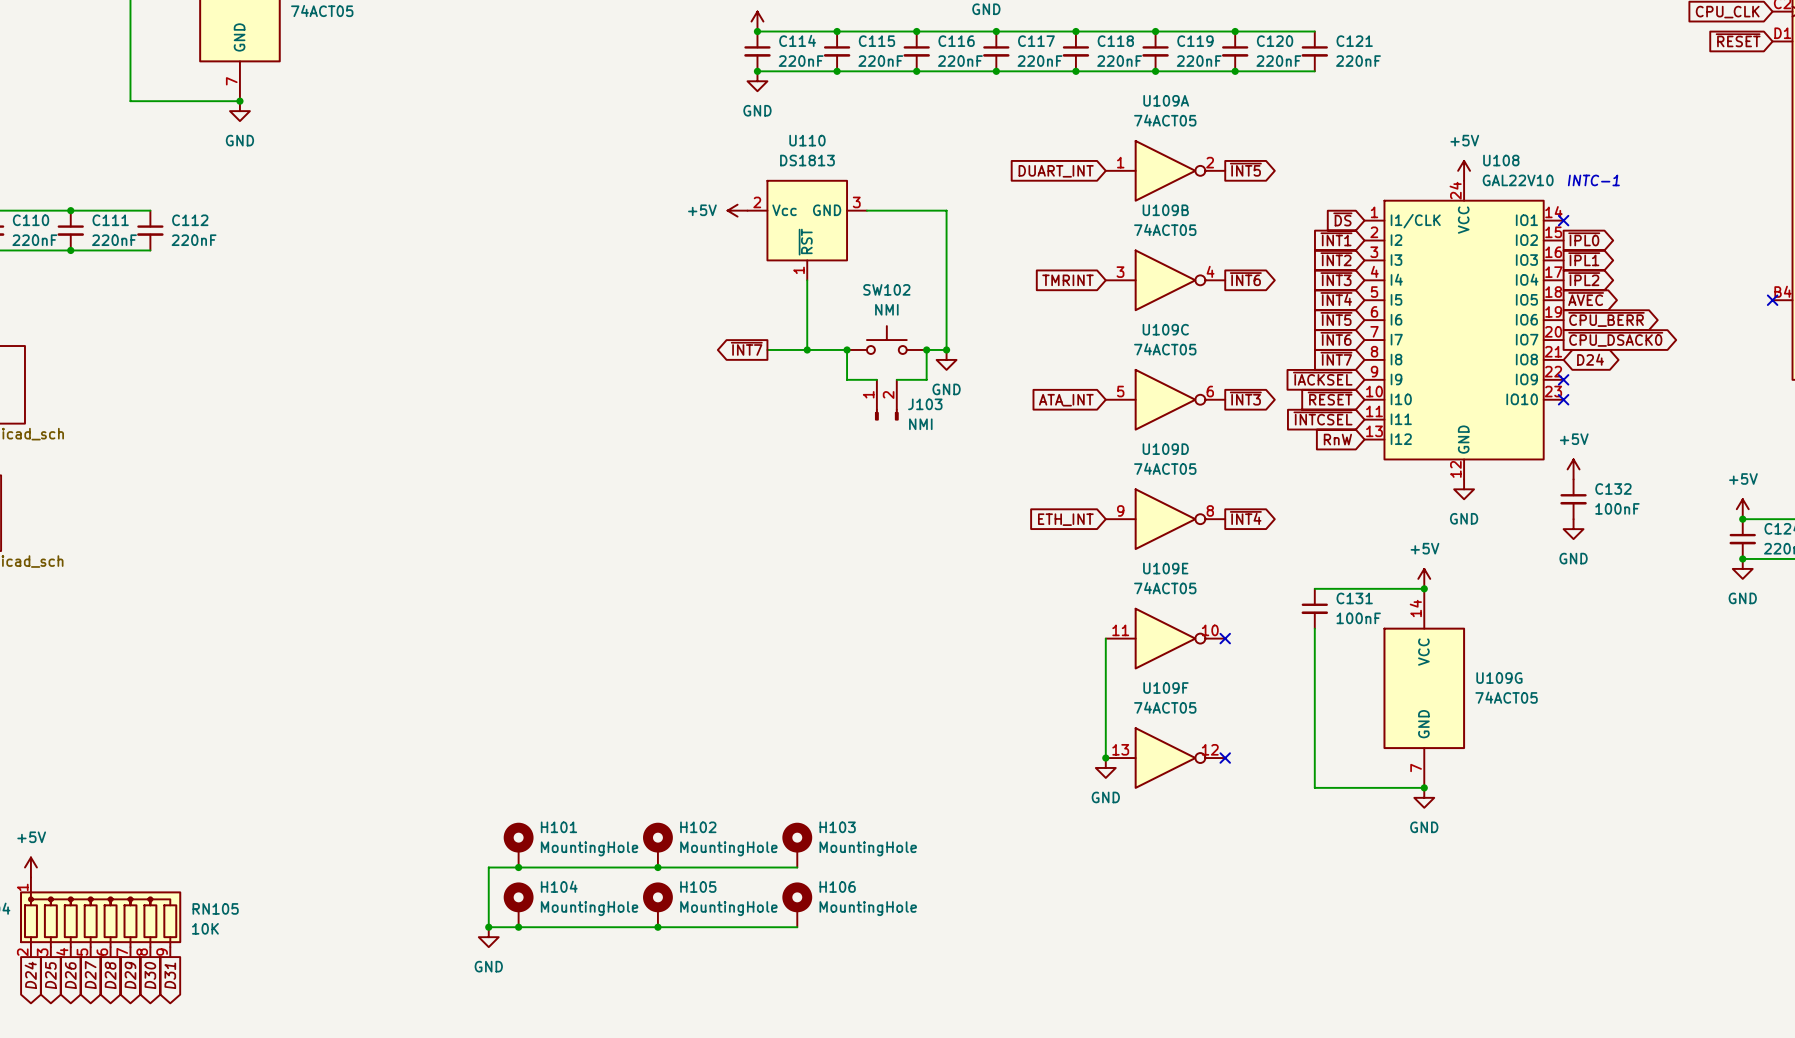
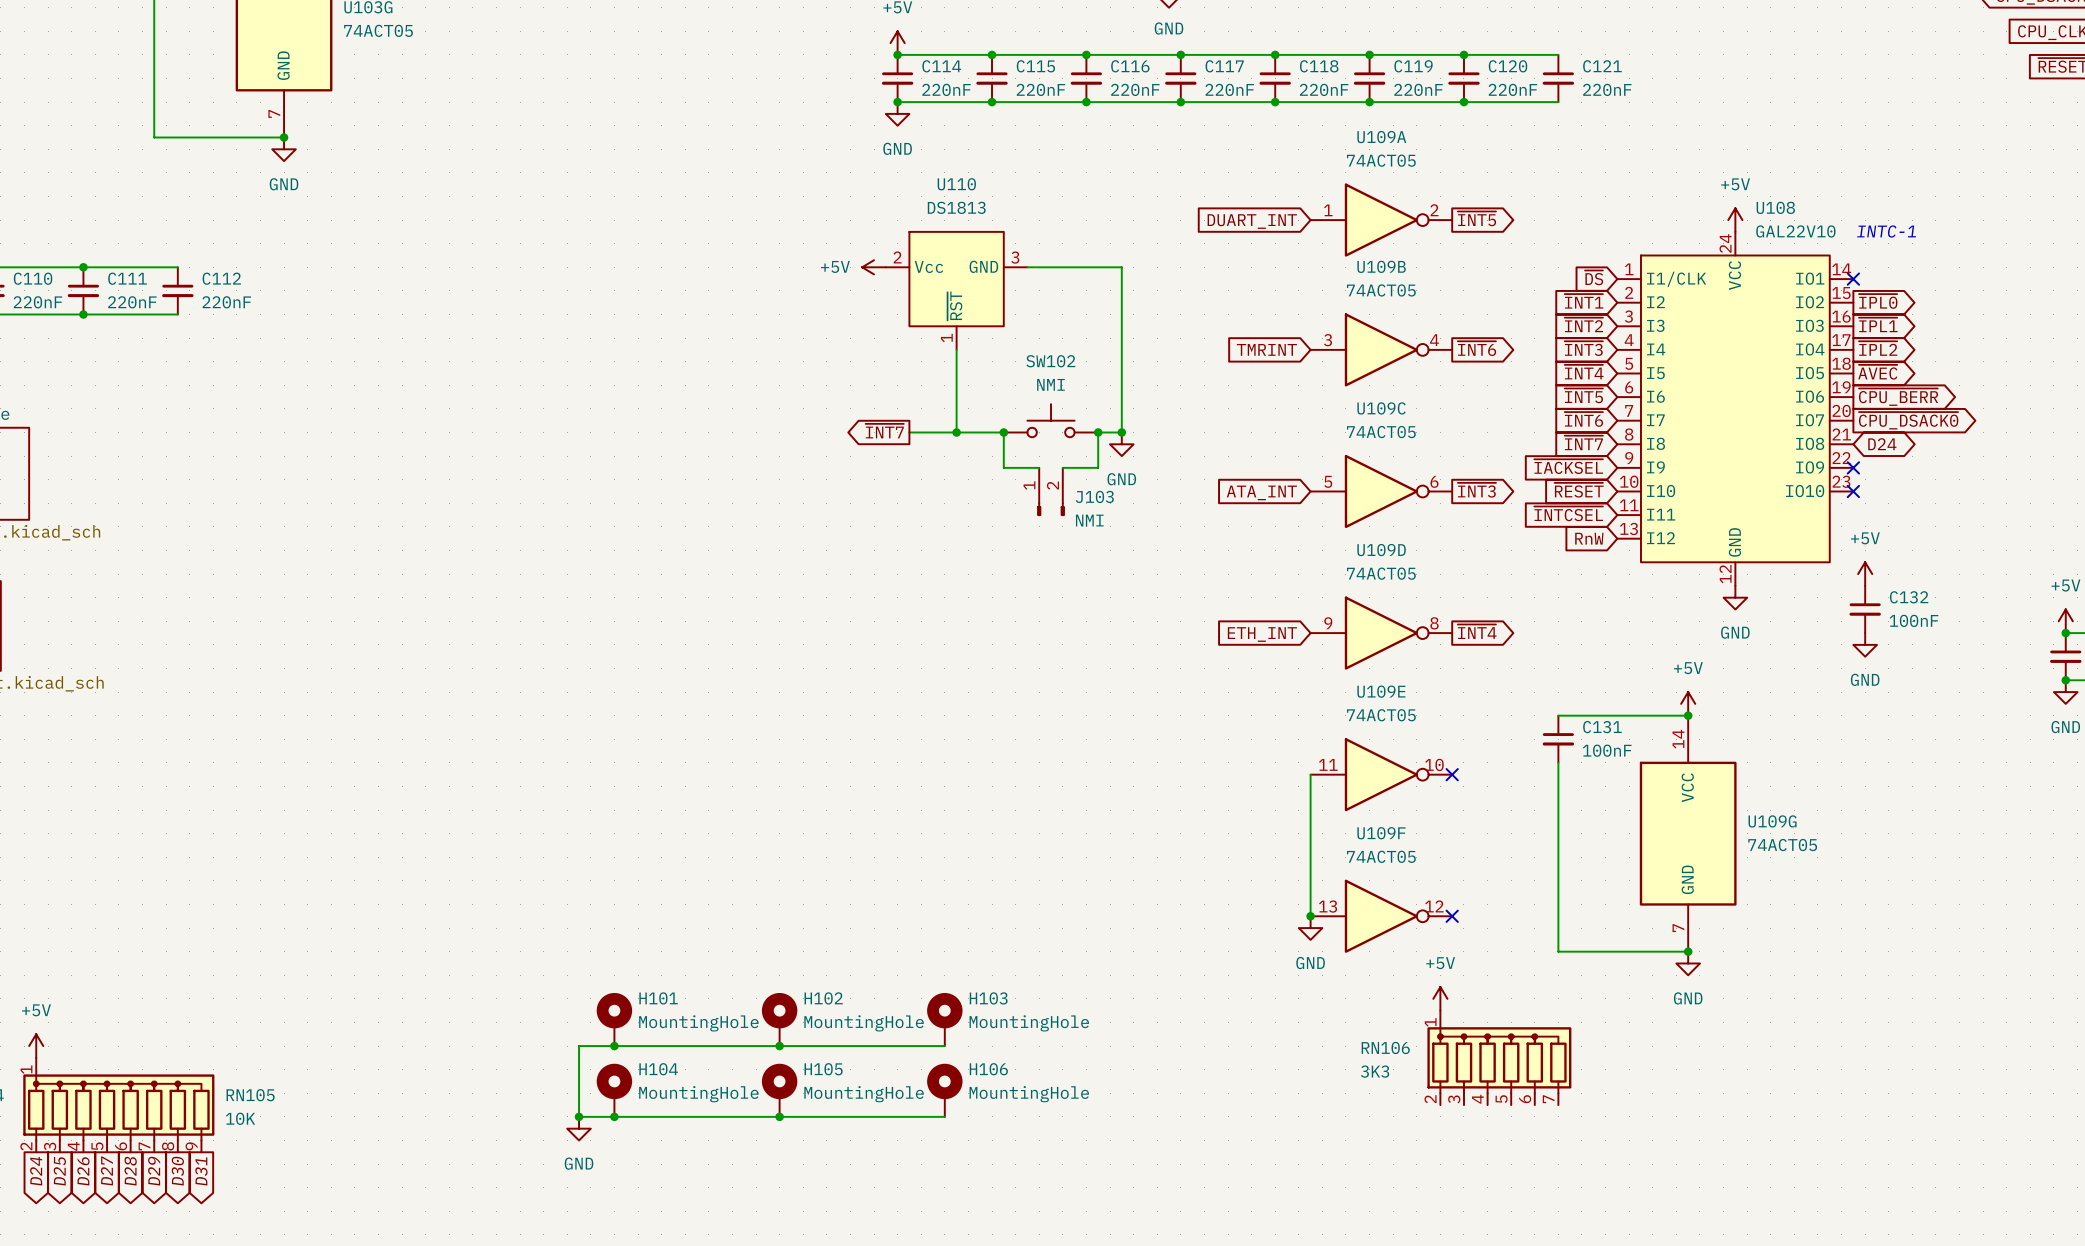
power symbol: none -> +5V (1440, 998)
RN106: none -> 3K3 (1499, 1057)

